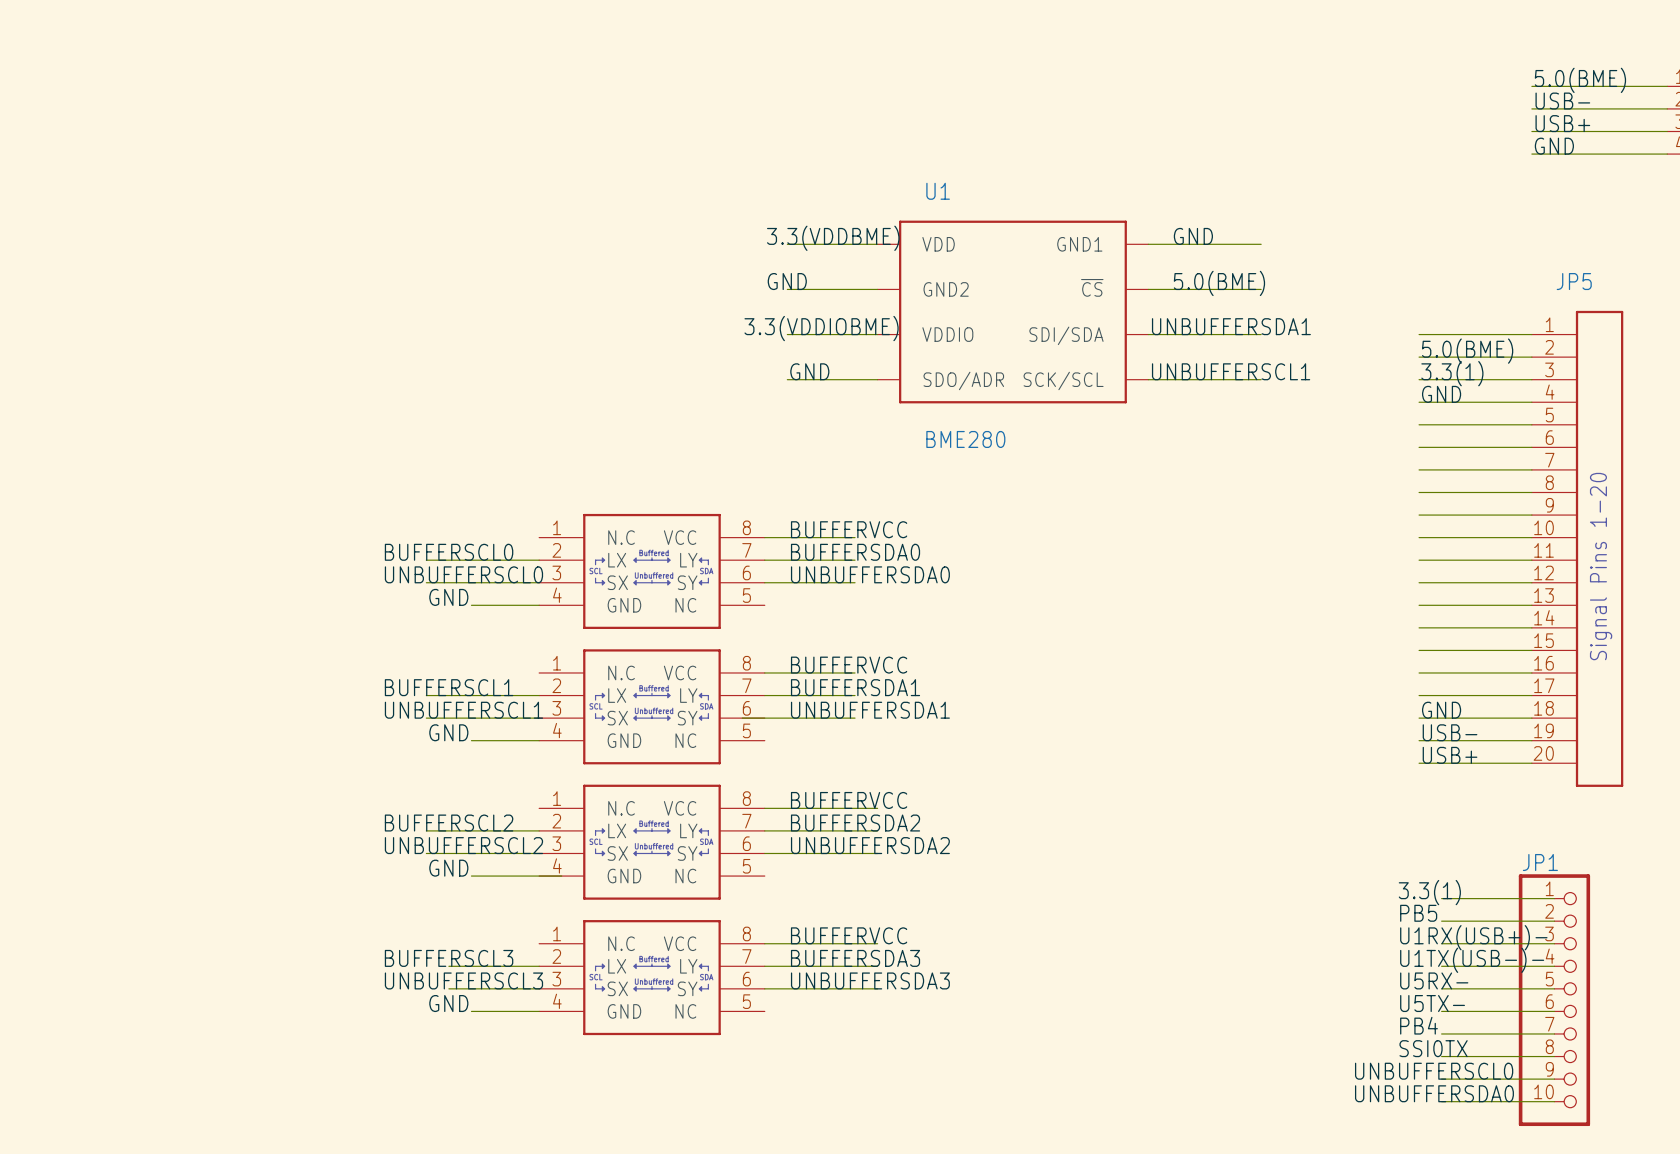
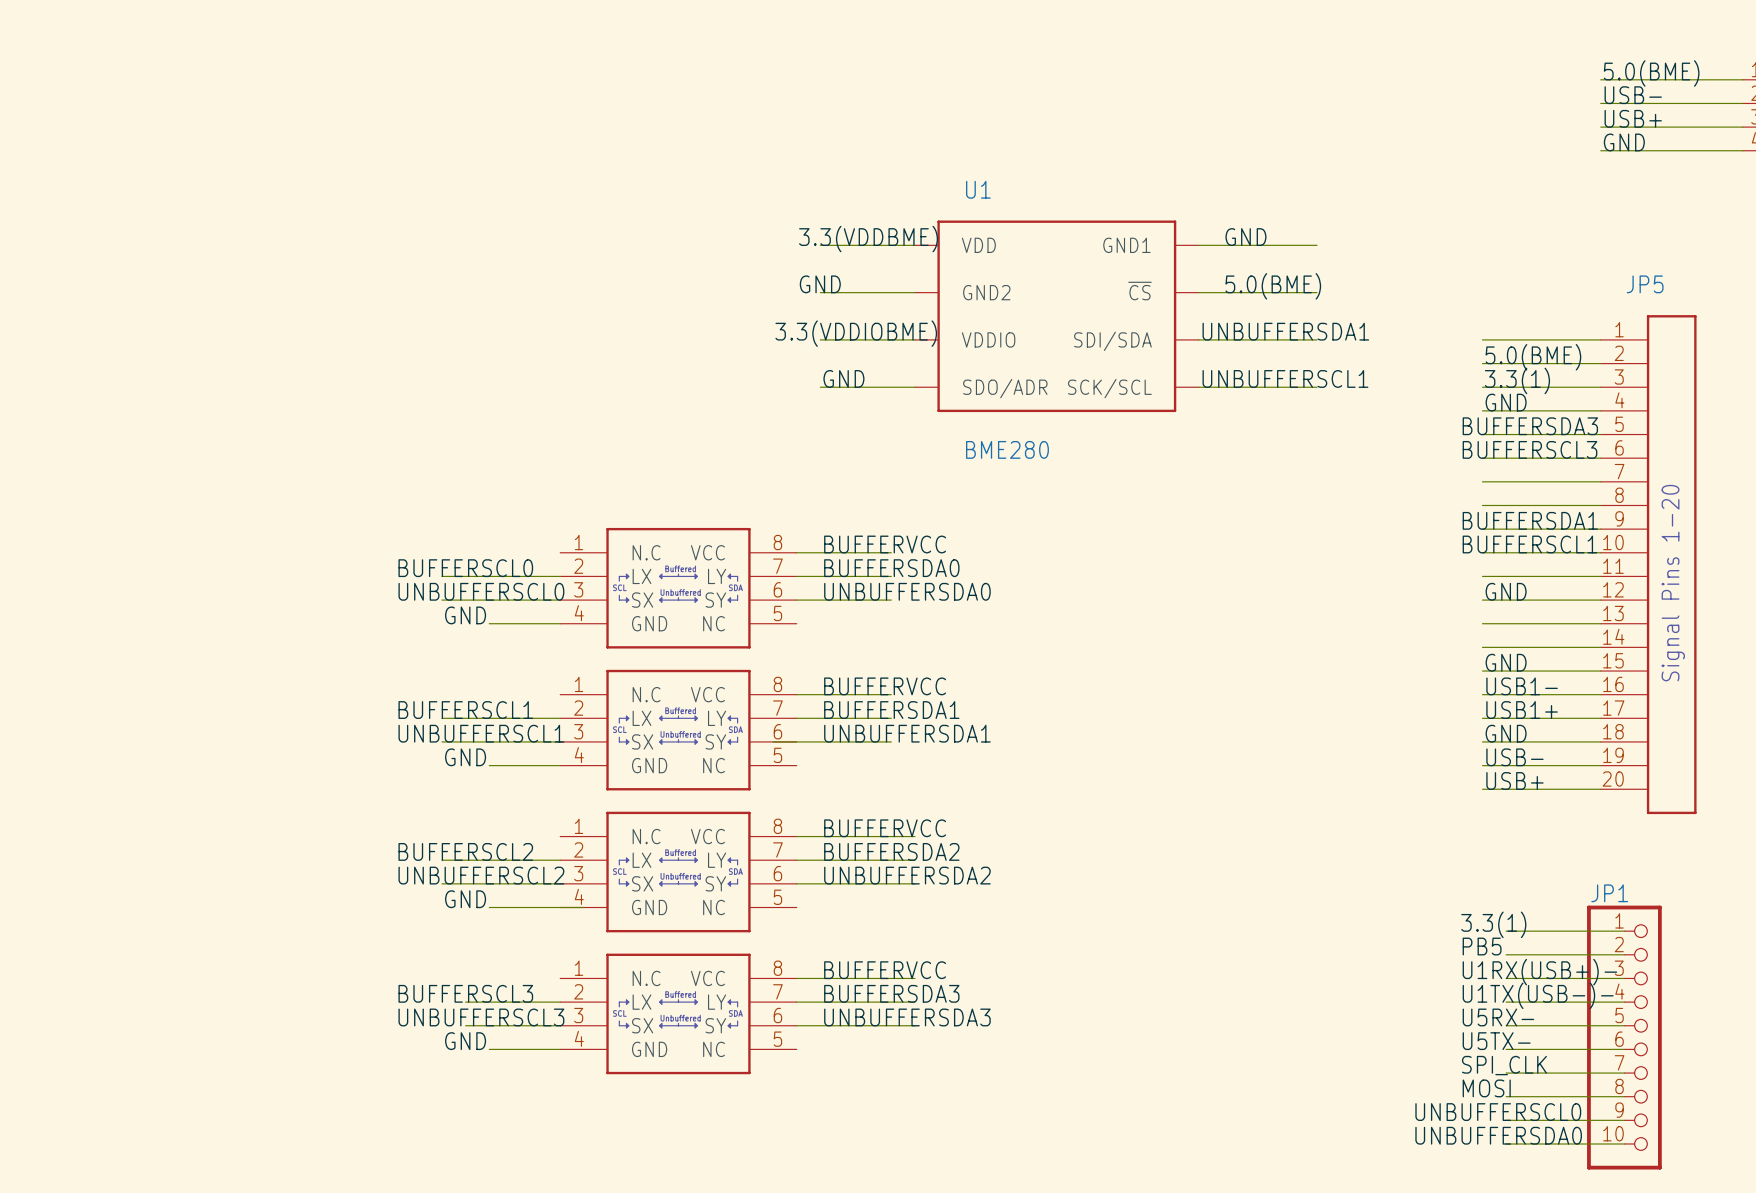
label: none -> BUFFERSDA3 (1530, 426)
label: none -> BUFFERSCL3 (1529, 449)
label: none -> BUFFERSDA1 (1530, 520)
label: none -> BUFFERSCL1 (1529, 544)
label: none -> GND (1506, 591)
label: none -> GND (1506, 662)
label: none -> USB1- (1522, 686)
label: none -> USB1+ (1522, 710)
label: PB4 (1419, 1025) -> SPI_CLK (1504, 1065)
label: SSI0TX (1433, 1048) -> MOSI (1486, 1088)

